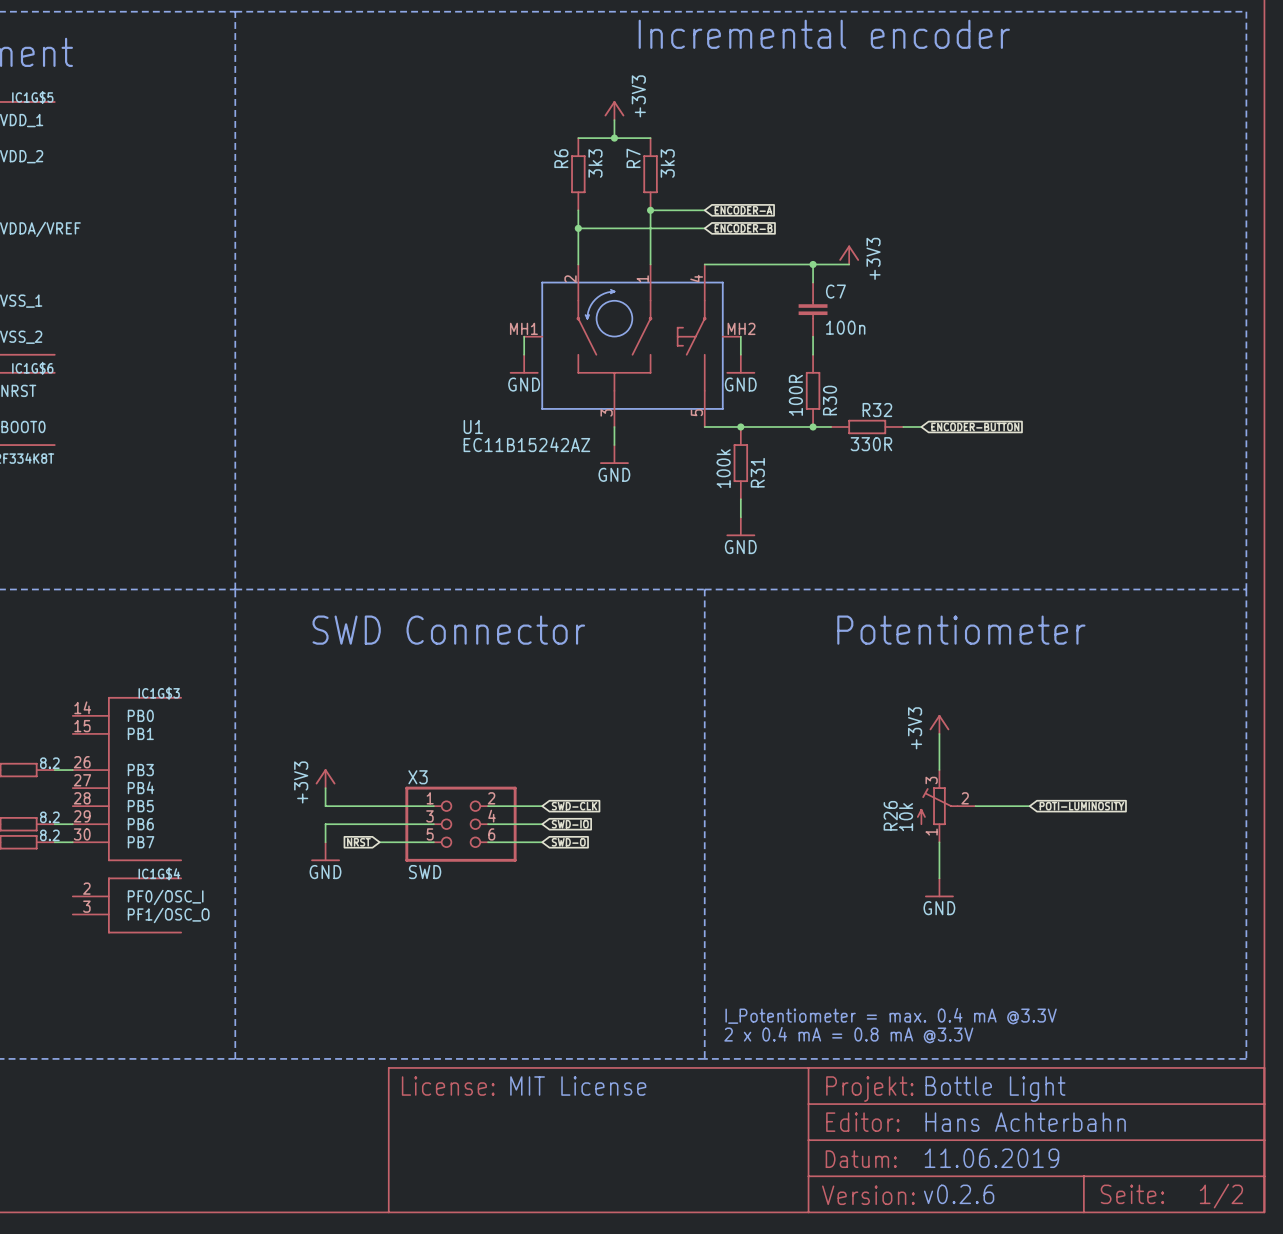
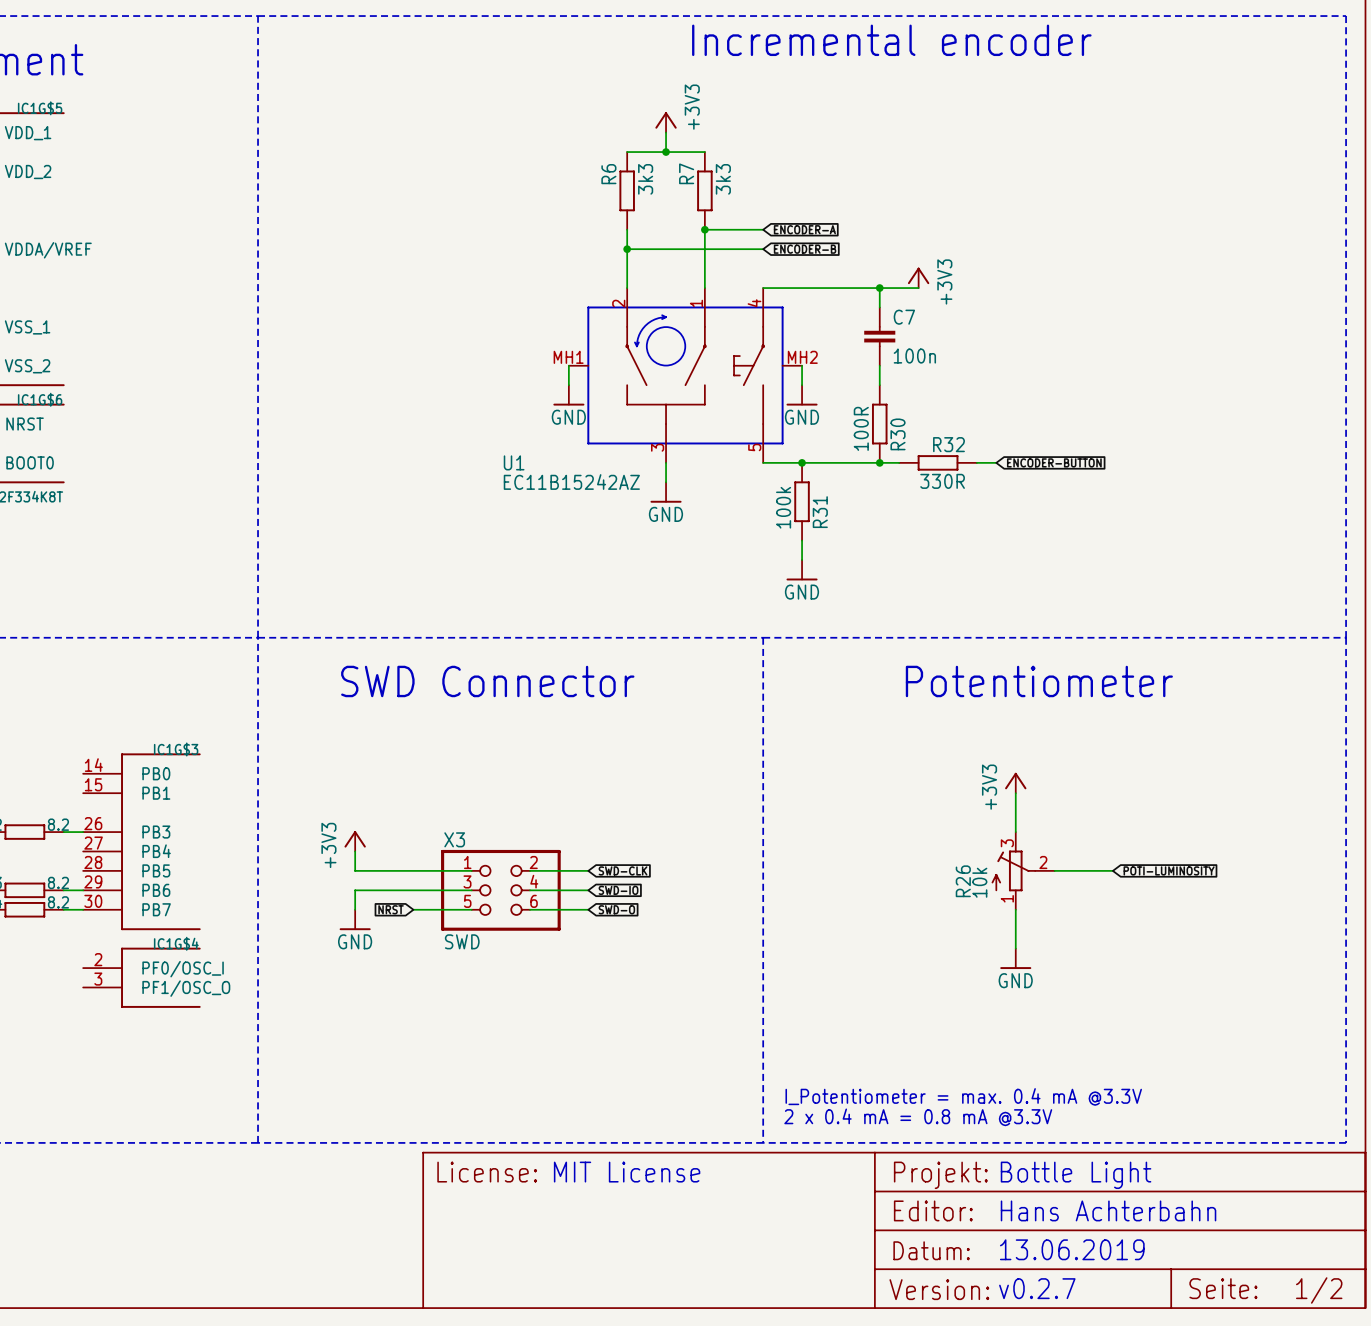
text: 11.06.2019 (991, 1158) -> 13.06.2019 (1072, 1249)
text: v0.2.6 (959, 1194) -> v0.2.7 (1037, 1288)

